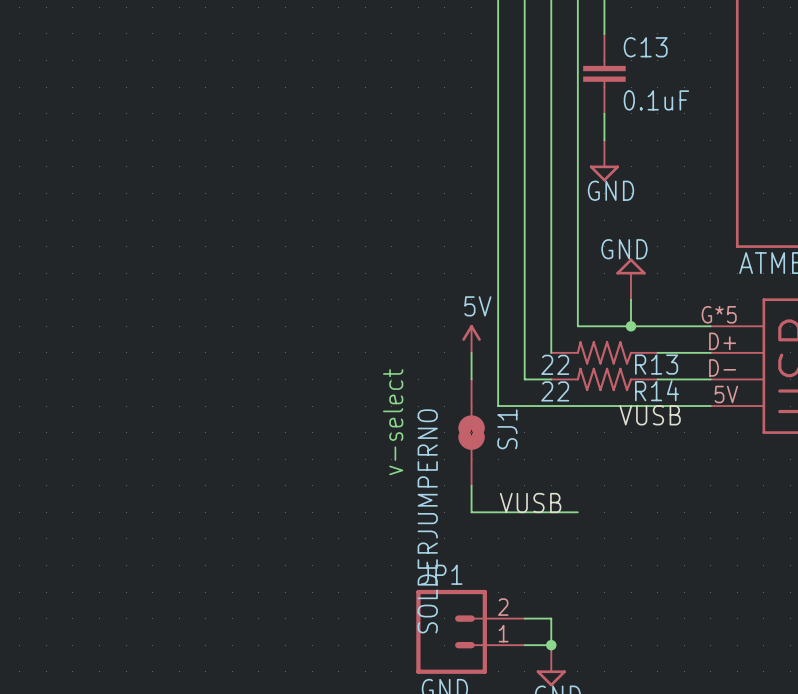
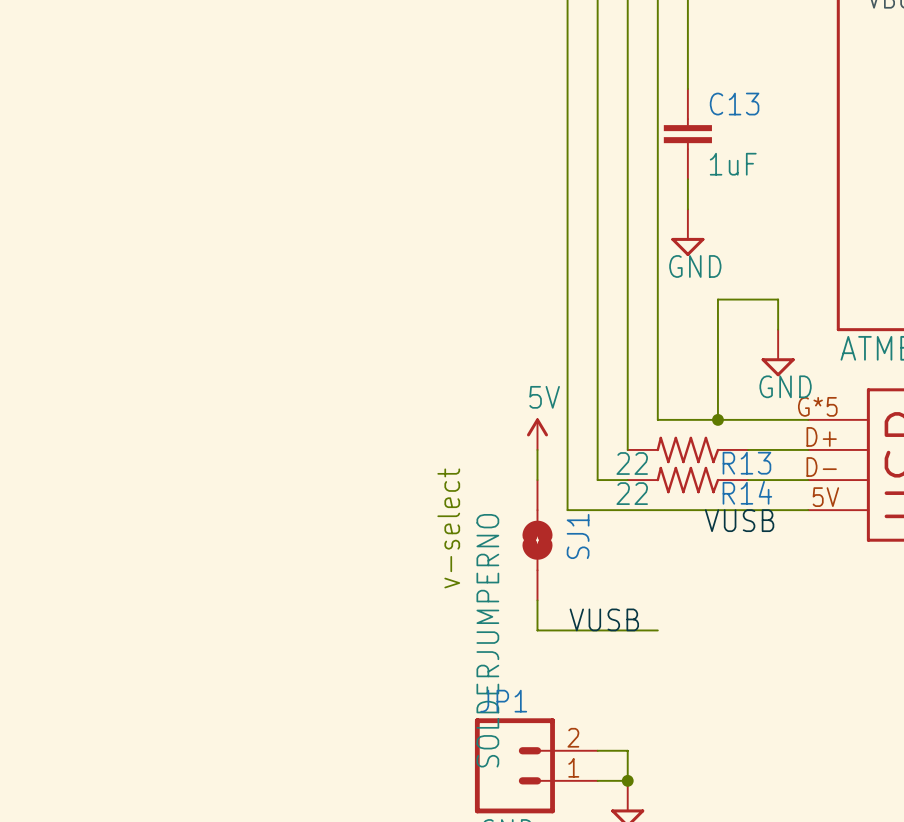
C13 value: 0.1uF (656, 100) -> 1uF (733, 164)
wire: none -> (778, 329) (778, 299) (717, 299) (717, 389)
power symbol rotation: 0° (631, 266) -> 180° (778, 367)
power symbol position: GND (631, 279) -> GND (778, 352)

